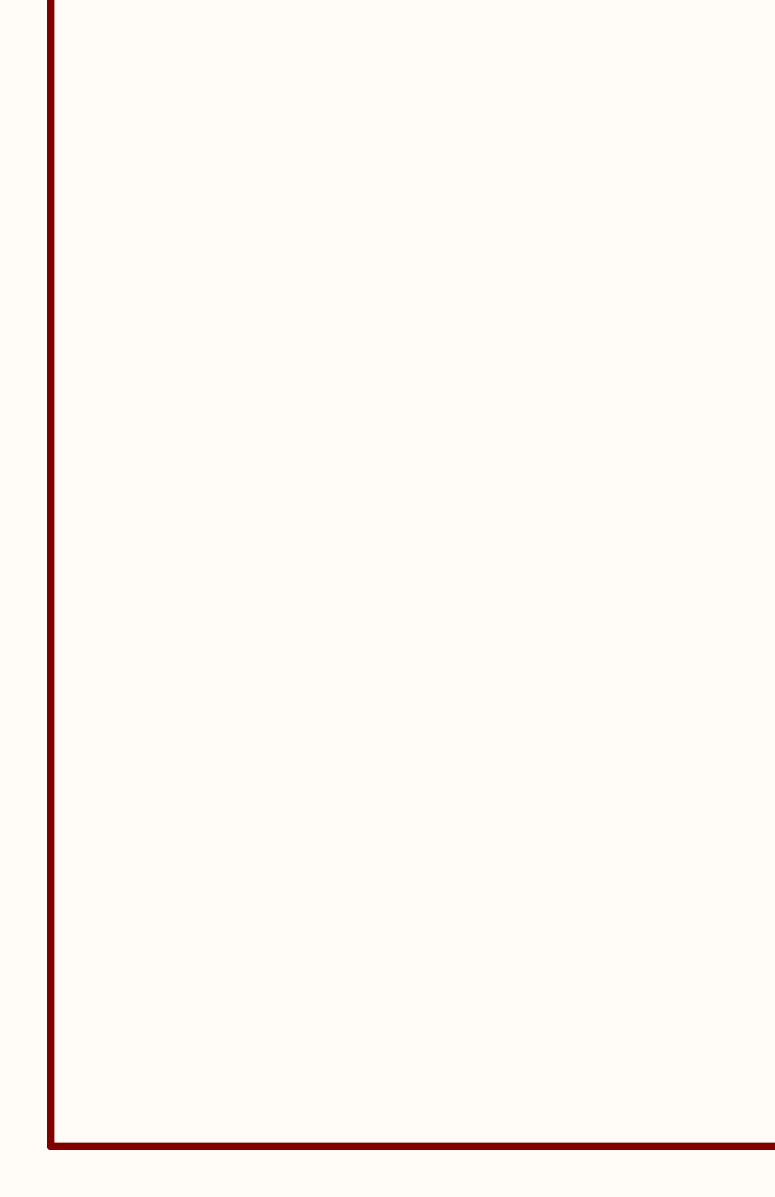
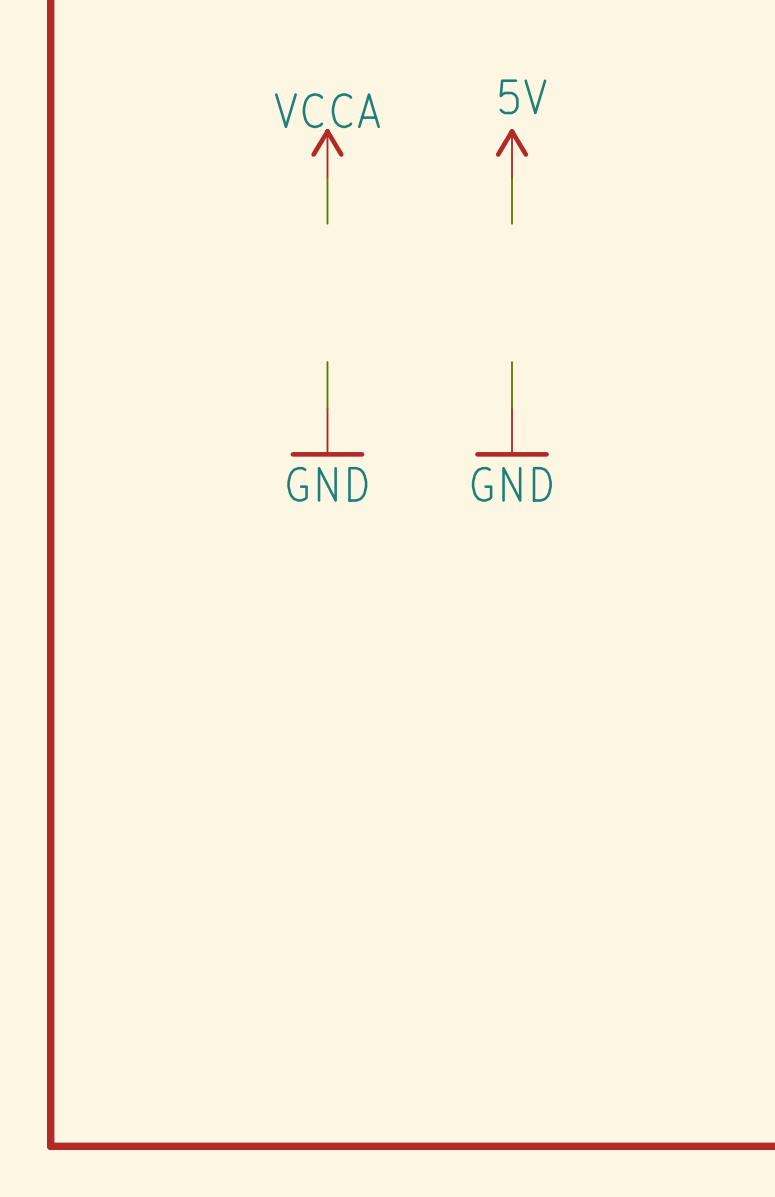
power symbol: none -> VCCA (327, 153)
power symbol: none -> 5V (512, 153)
wire: none -> (327, 177) (327, 223)
wire: none -> (512, 177) (512, 223)
wire: none -> (327, 362) (327, 408)
wire: none -> (512, 362) (512, 408)
power symbol: none -> GND (327, 432)
power symbol: none -> GND (512, 432)

